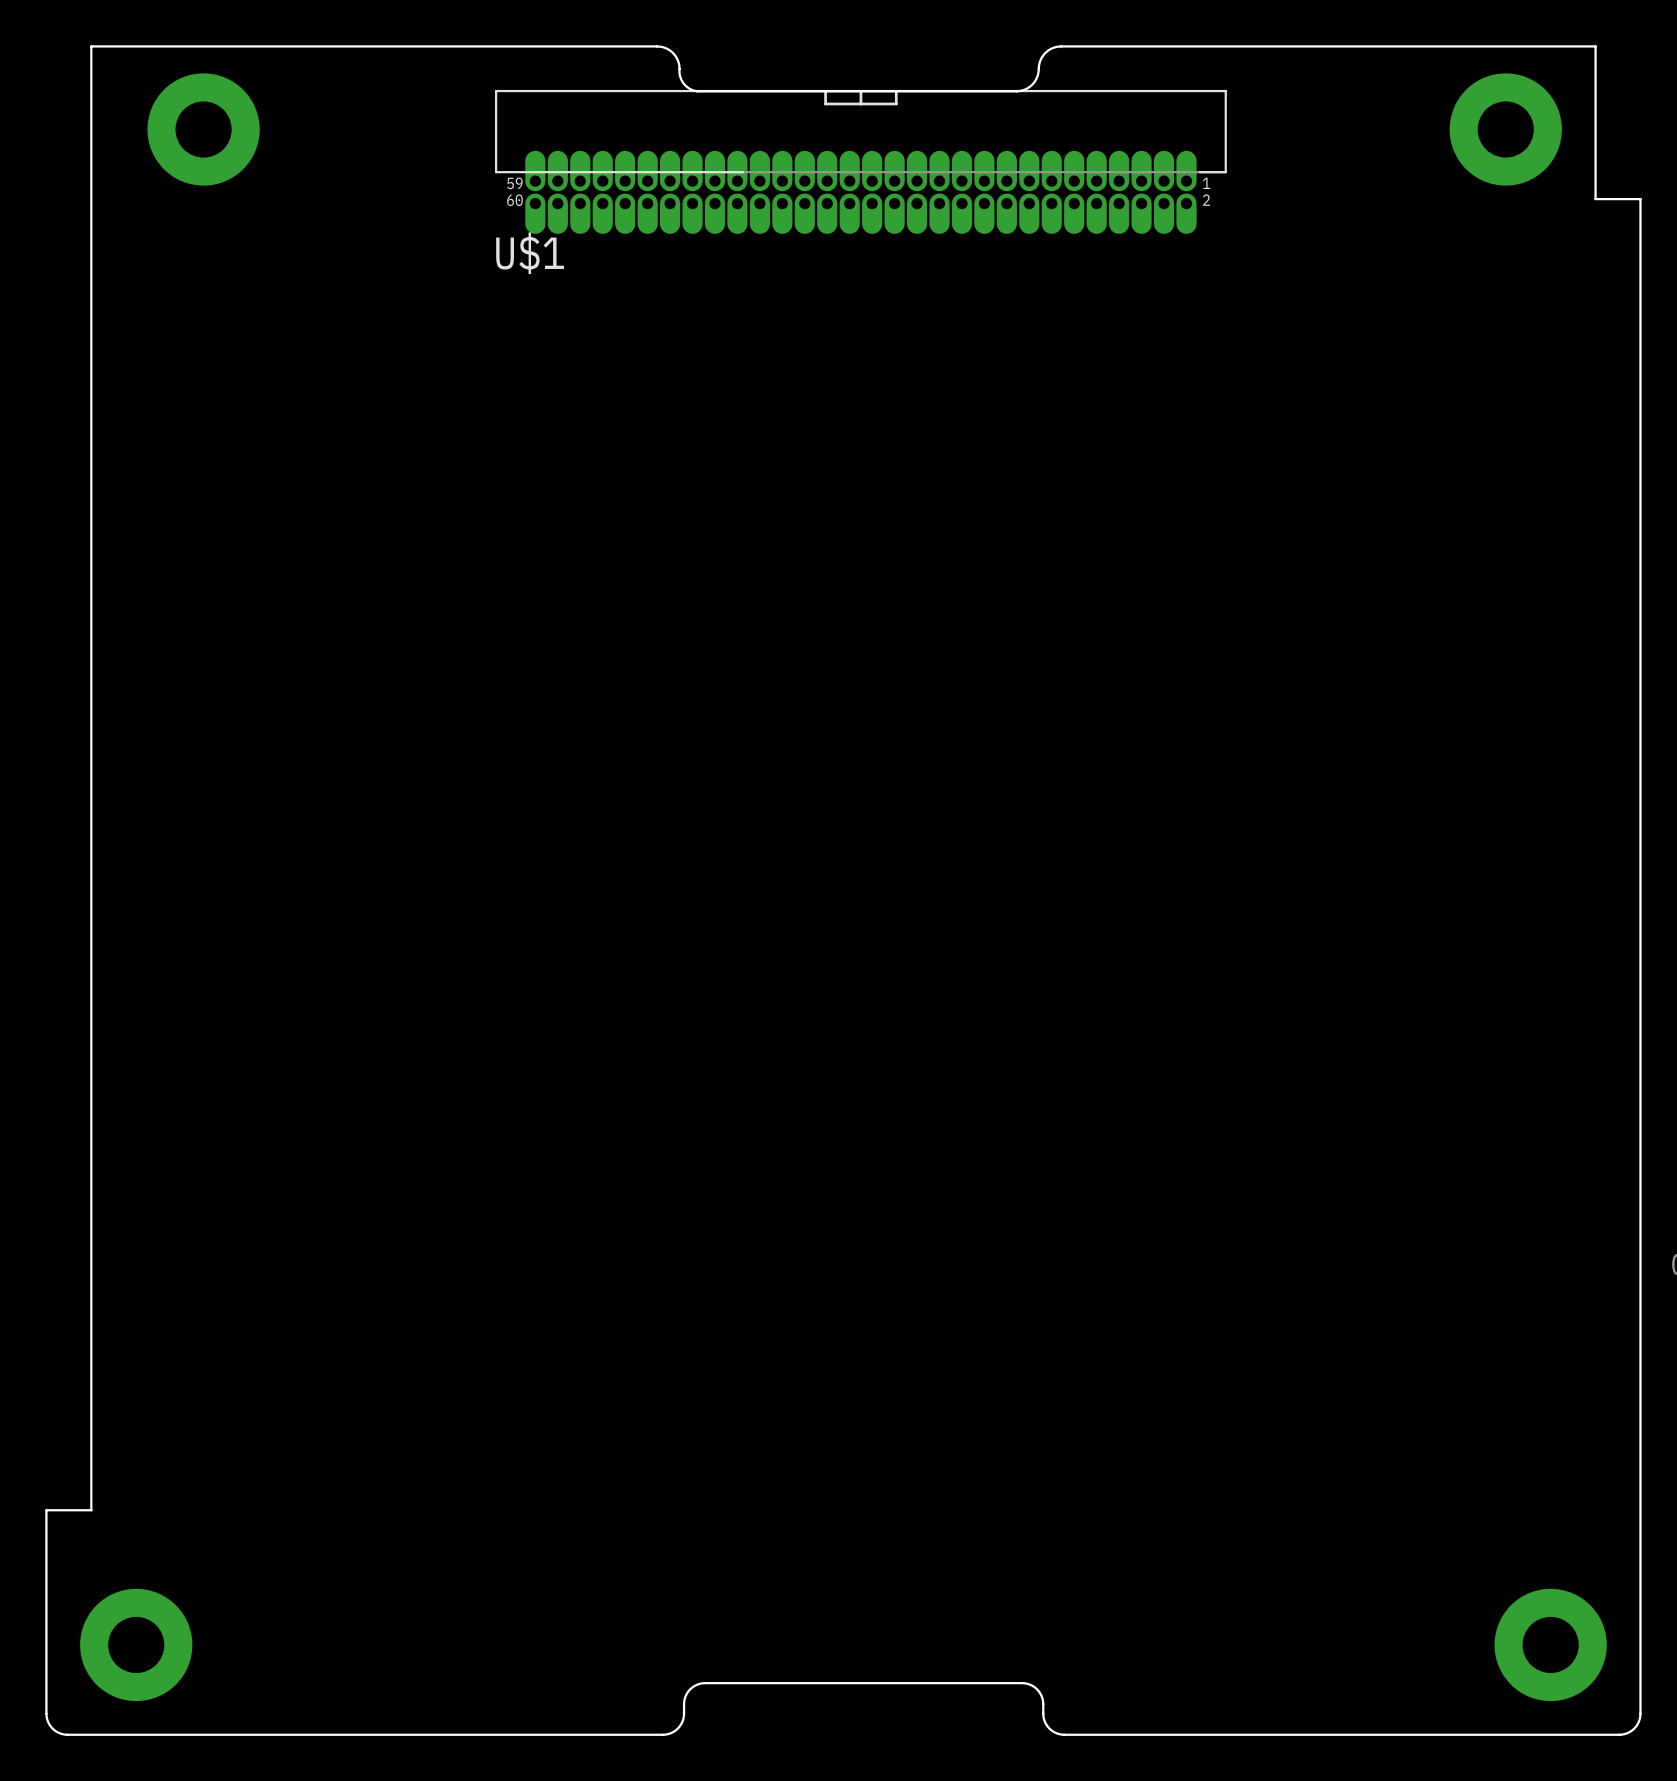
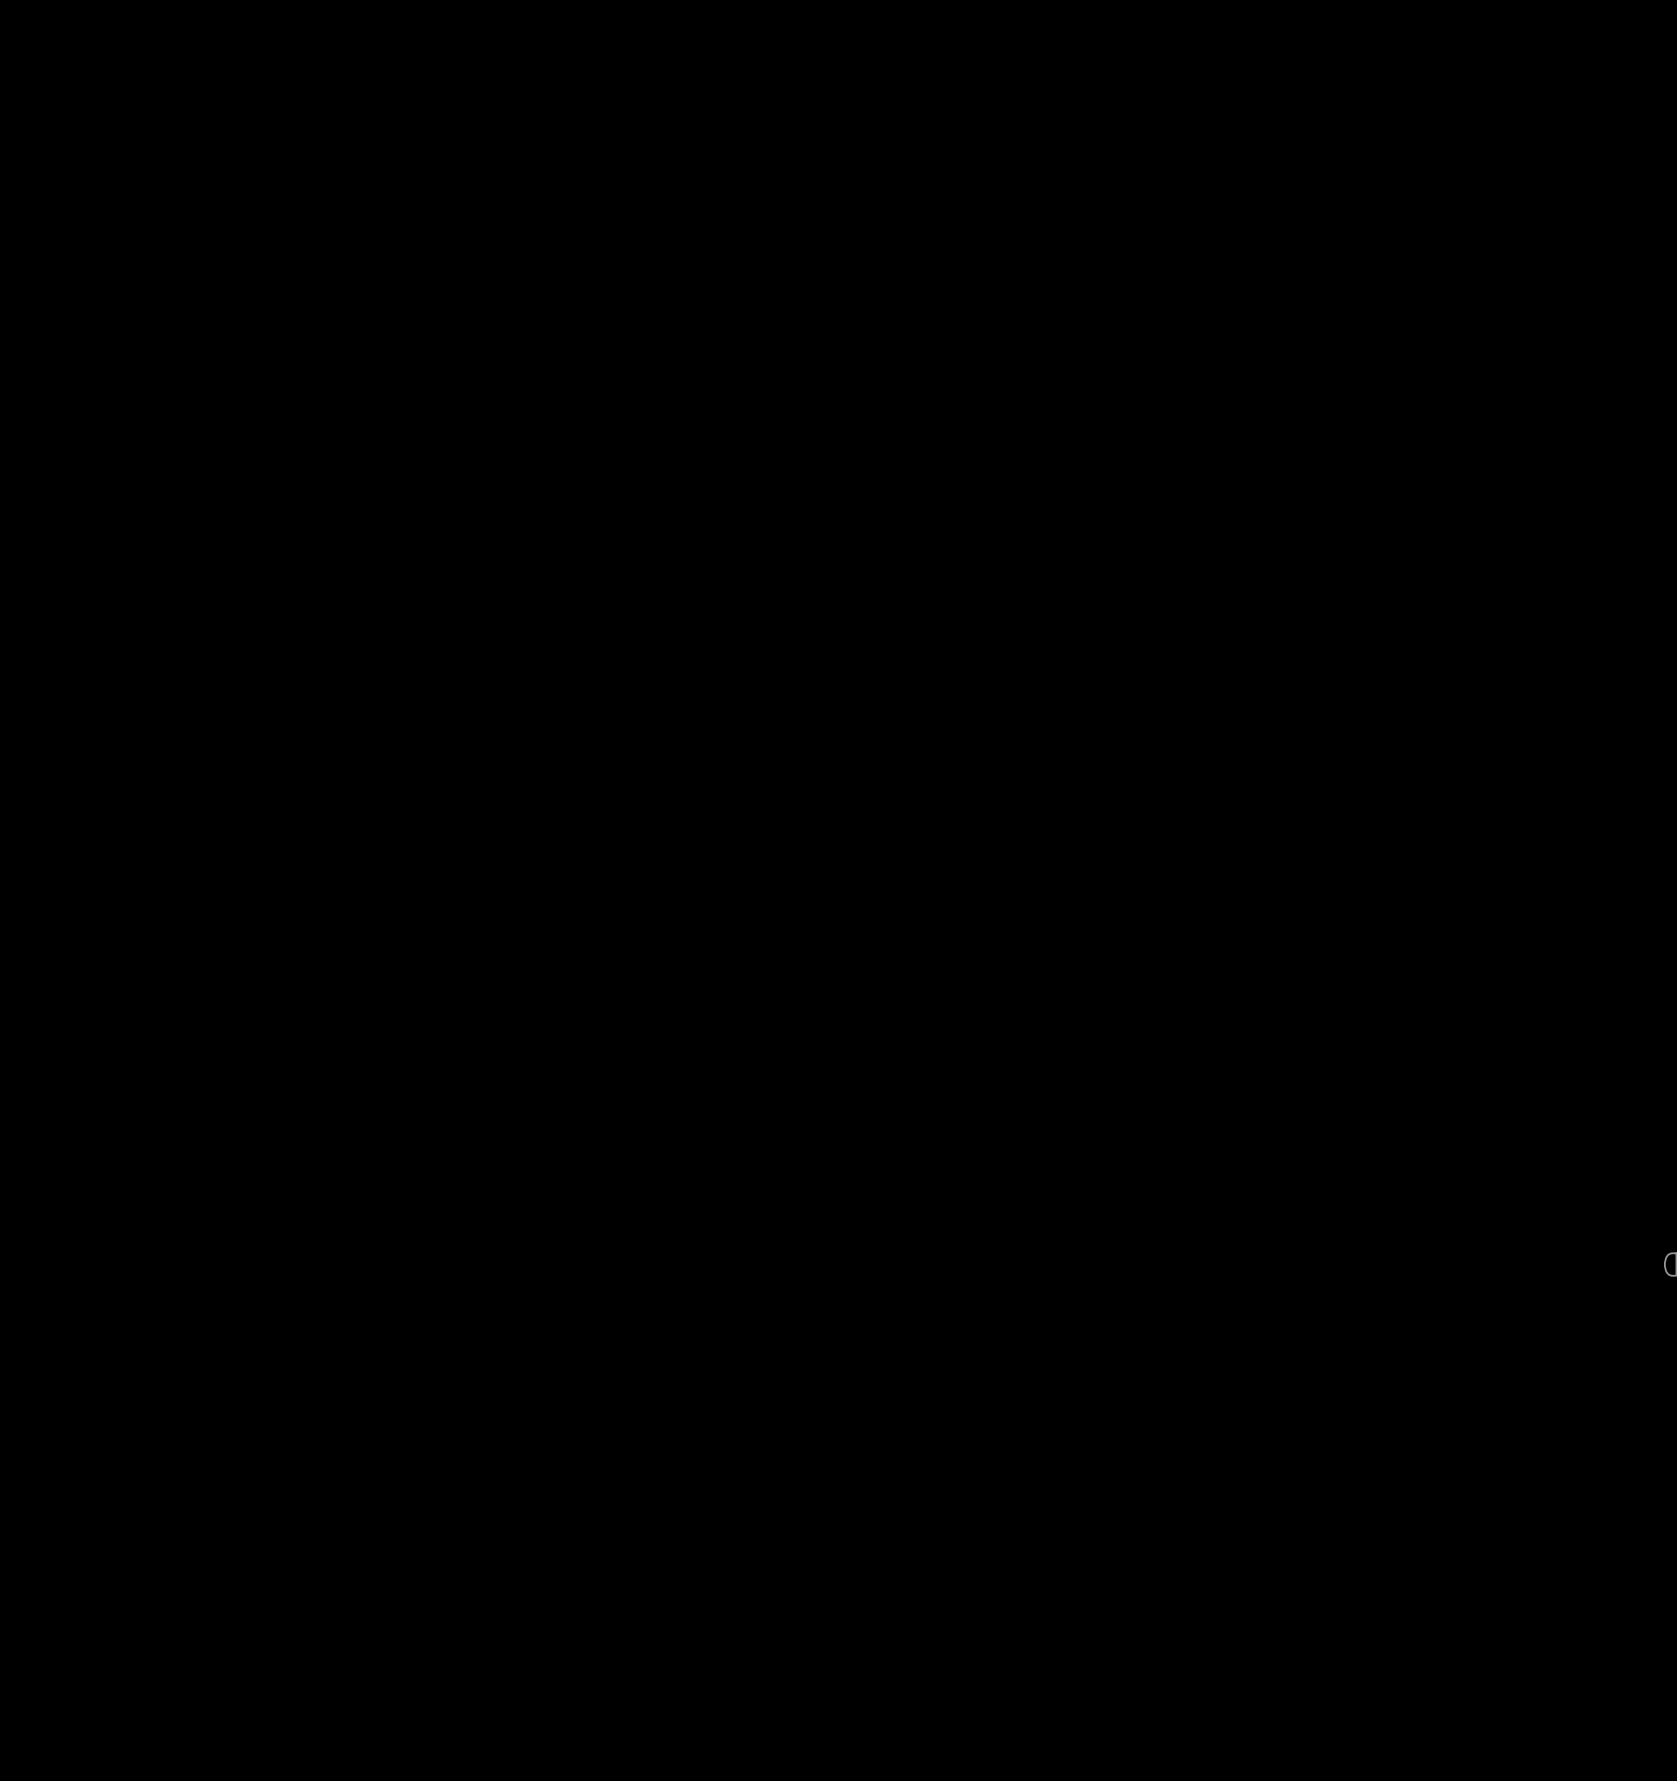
U$1: (843, 890) -> none

